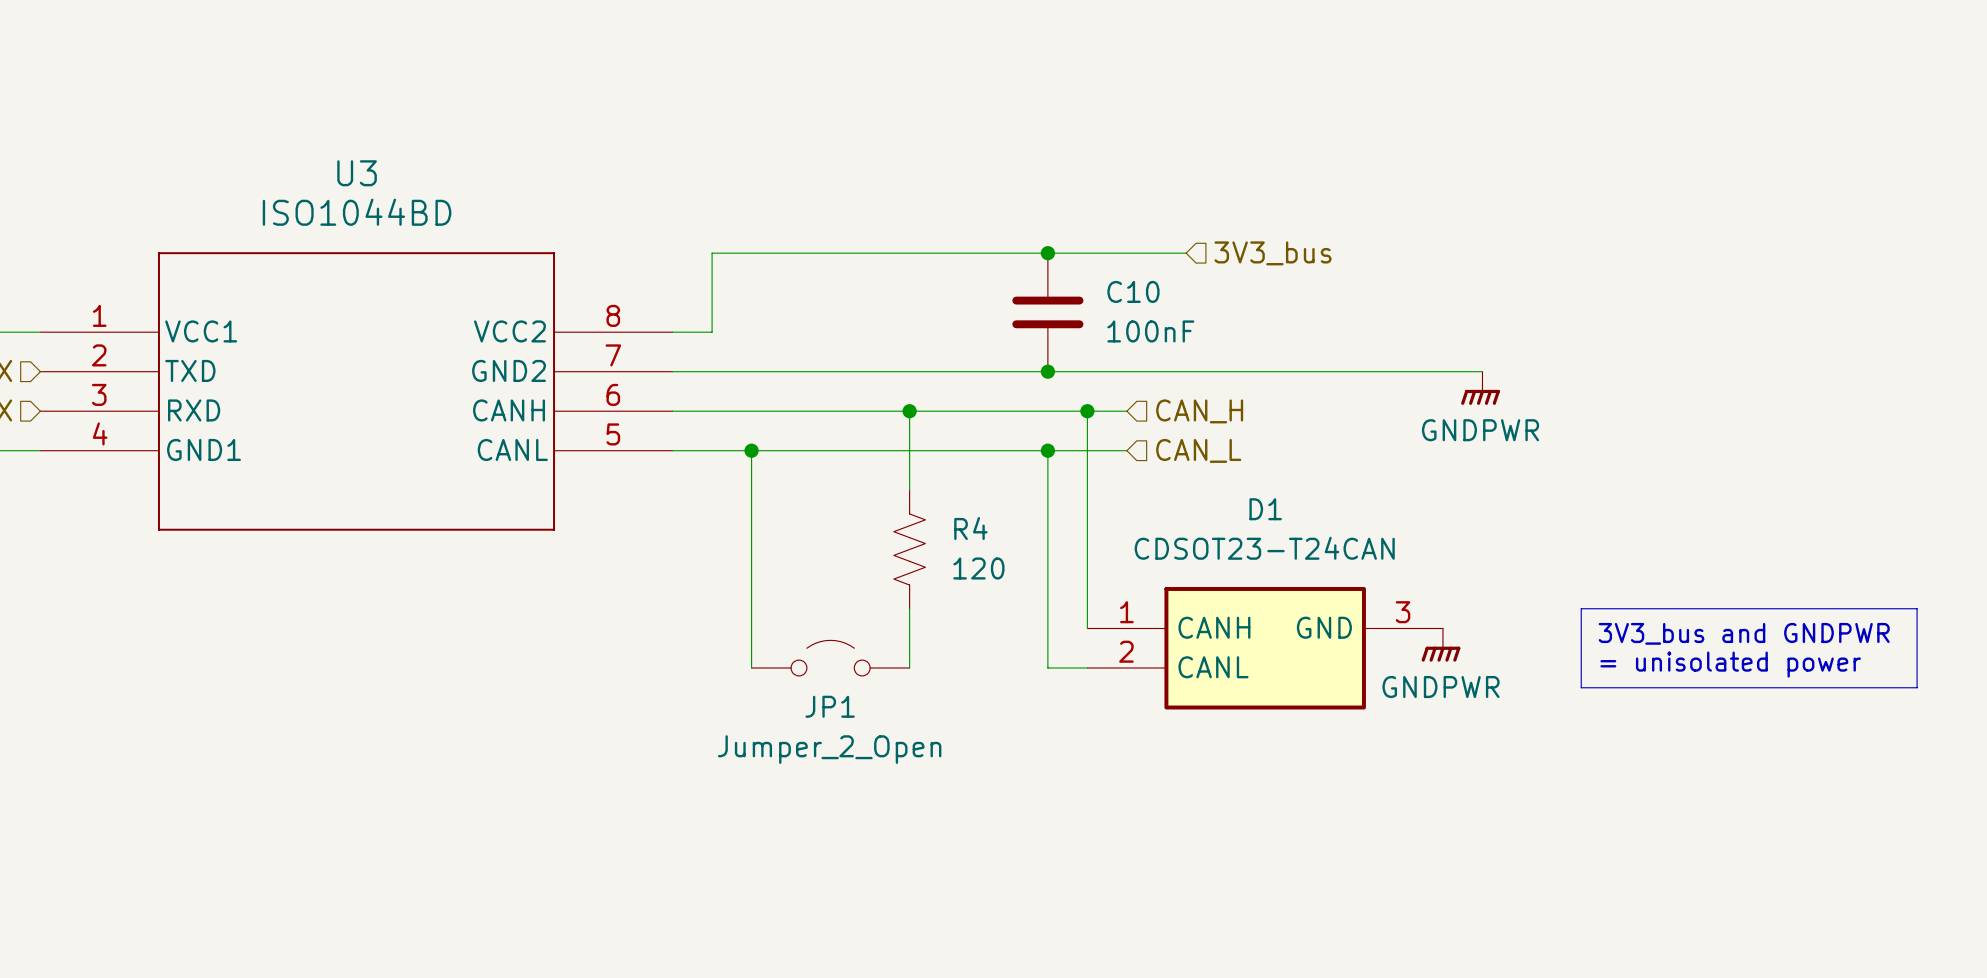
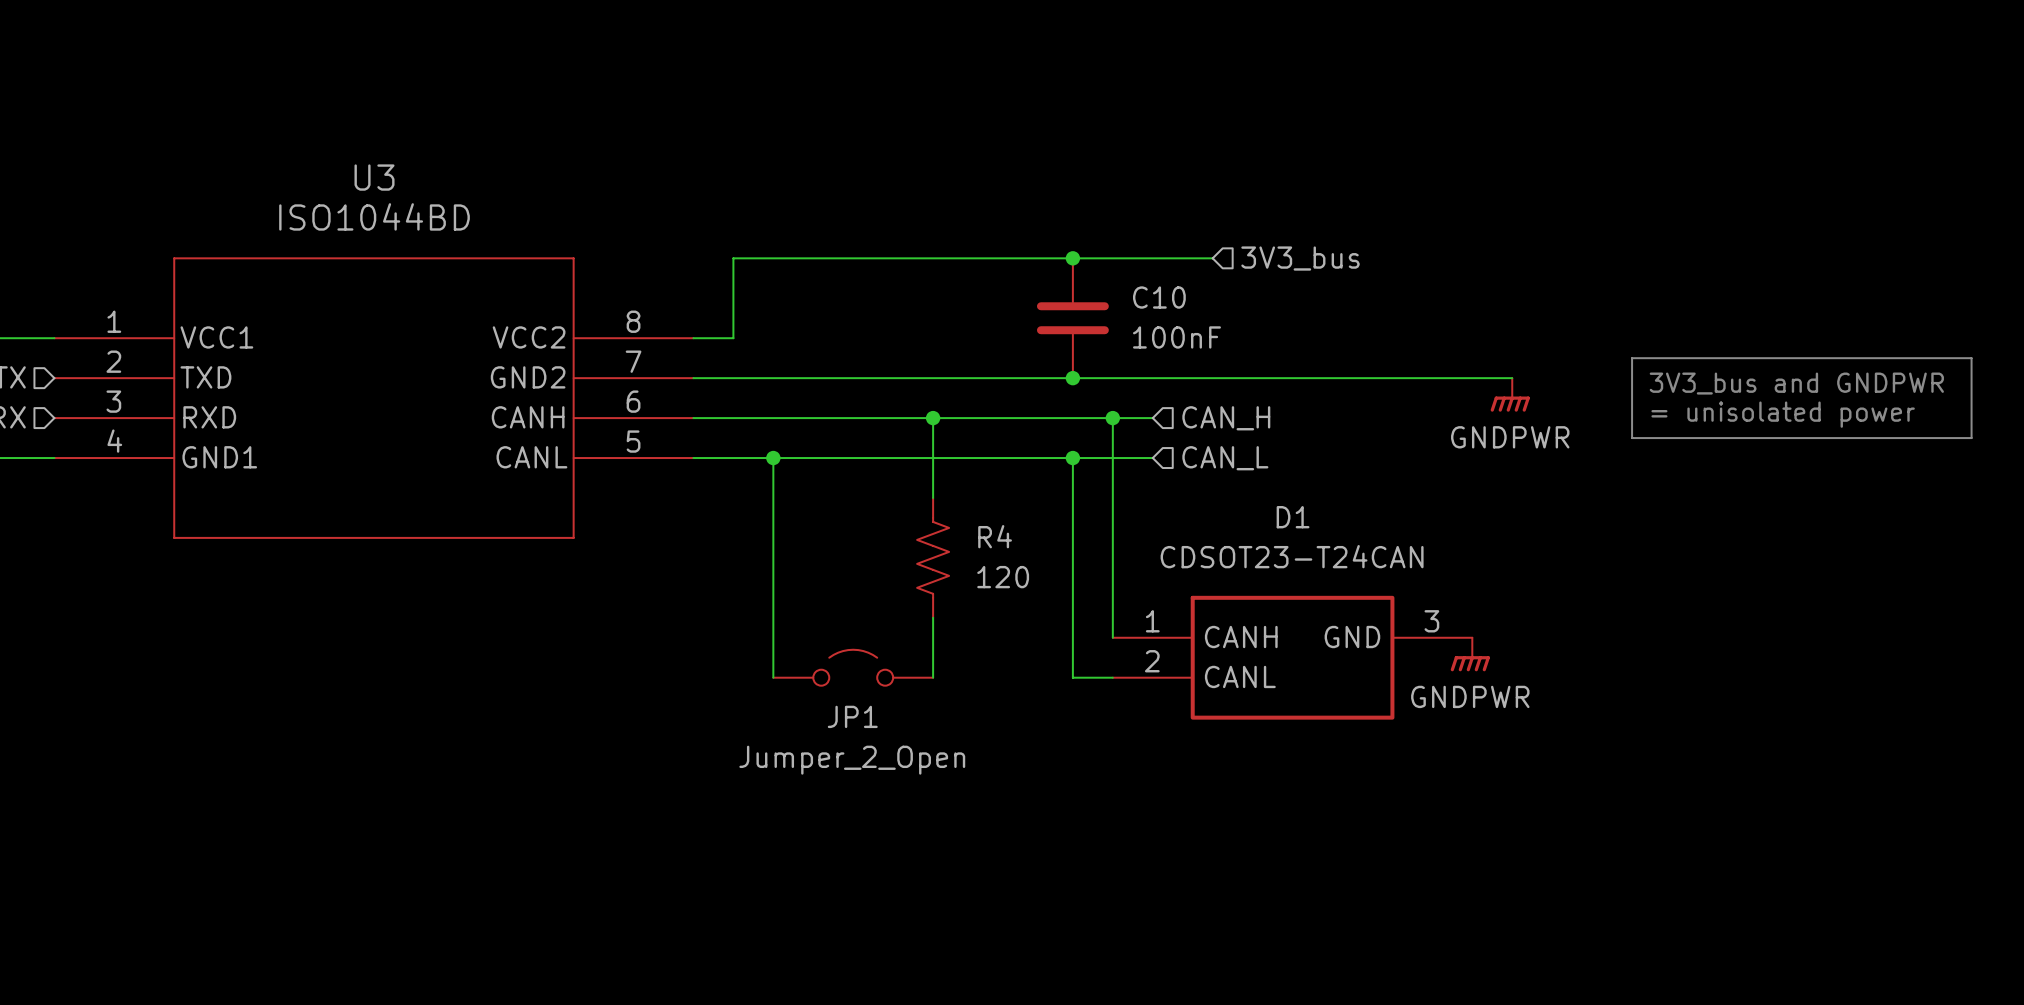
line: (1581, 608) (1917, 608) (1917, 687) (1581, 687) (1581, 608) -> (1632, 358) (1971, 358) (1971, 438) (1632, 438) (1632, 358)
text position: 3V3_bus and GNDPWR (1744, 633) -> 3V3_bus and GNDPWR (1796, 383)
text position: = unisolated power (1730, 664) -> = unisolated power (1783, 414)

